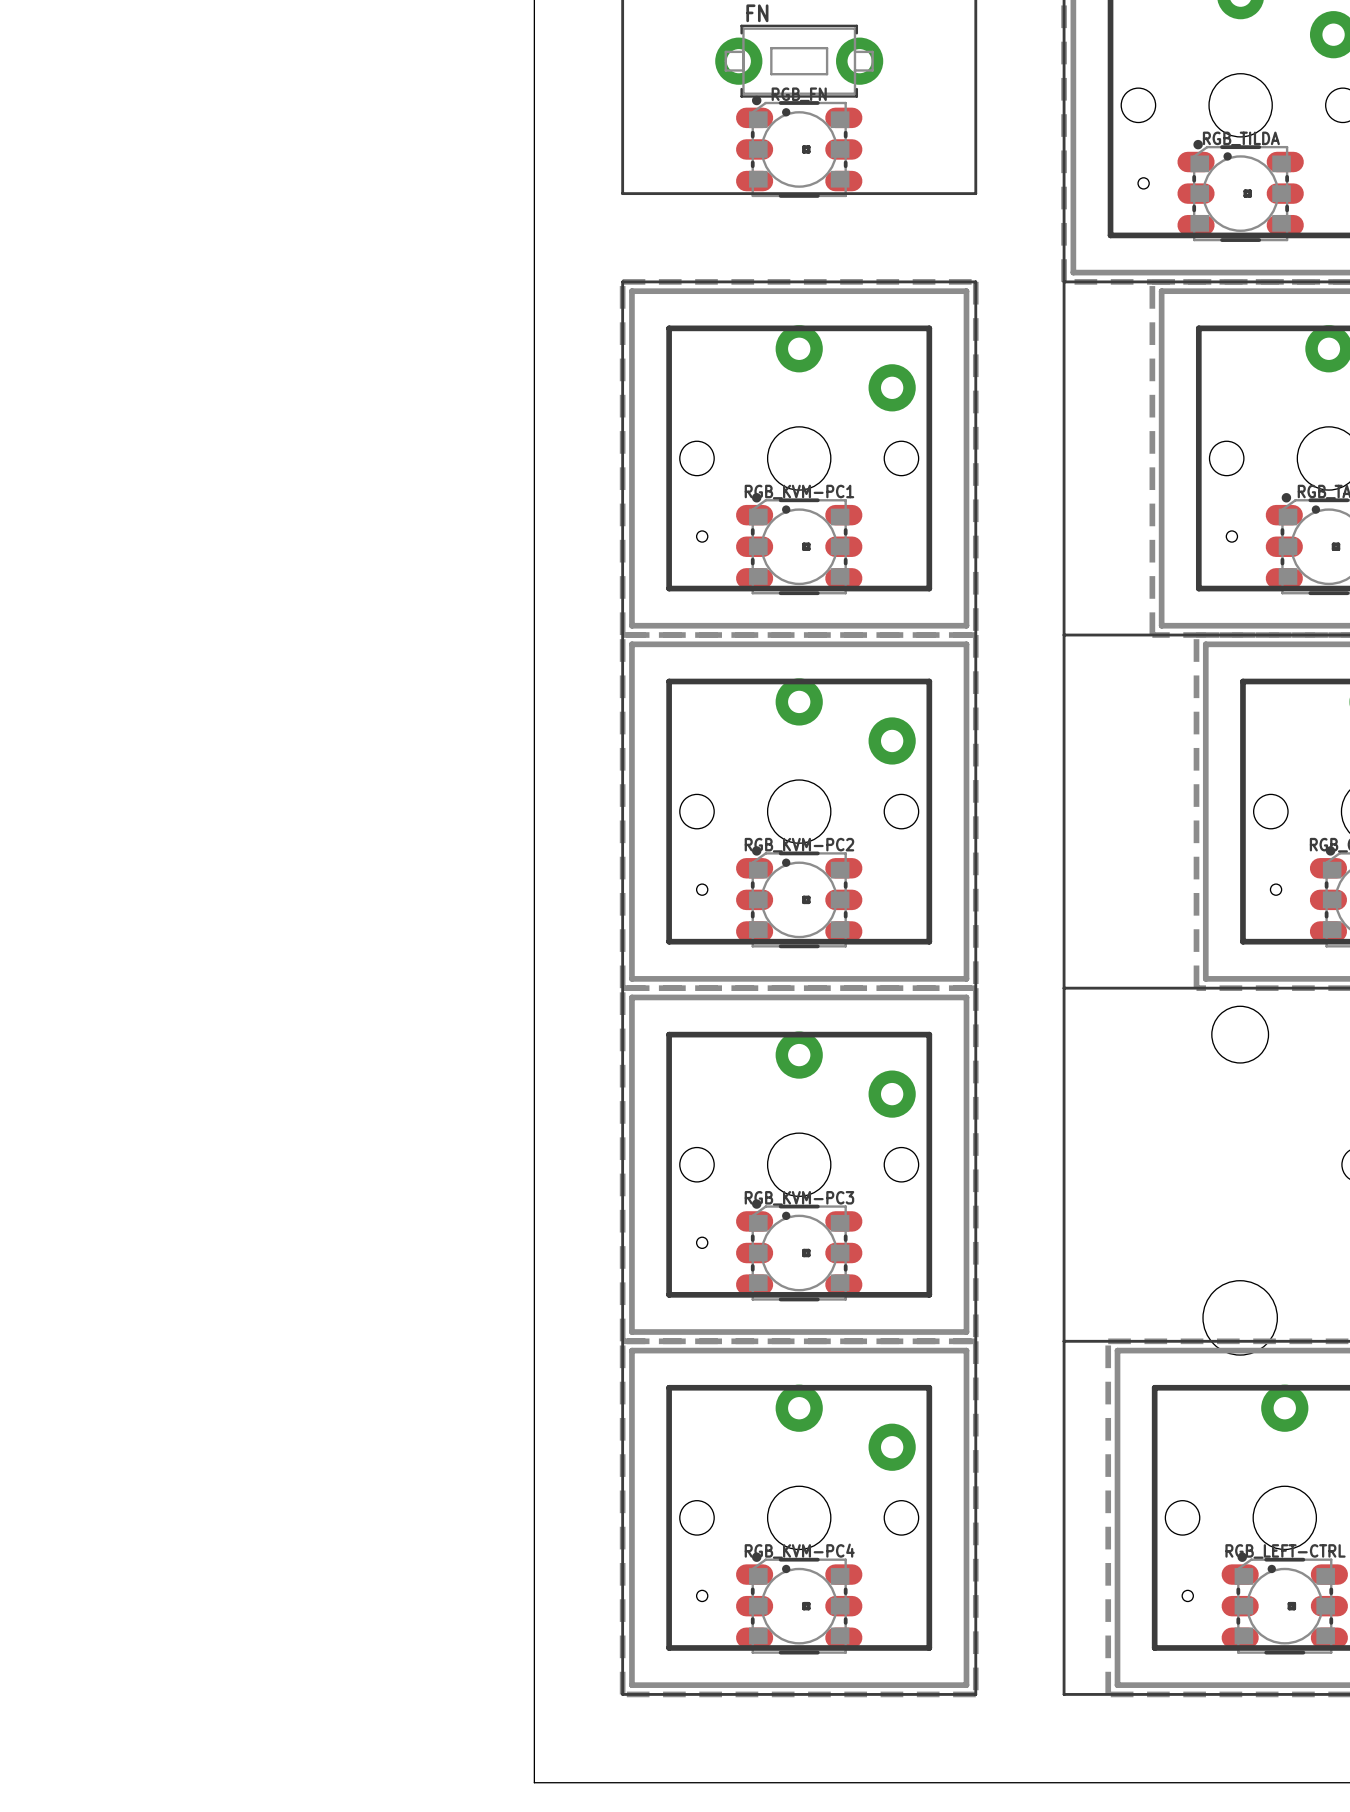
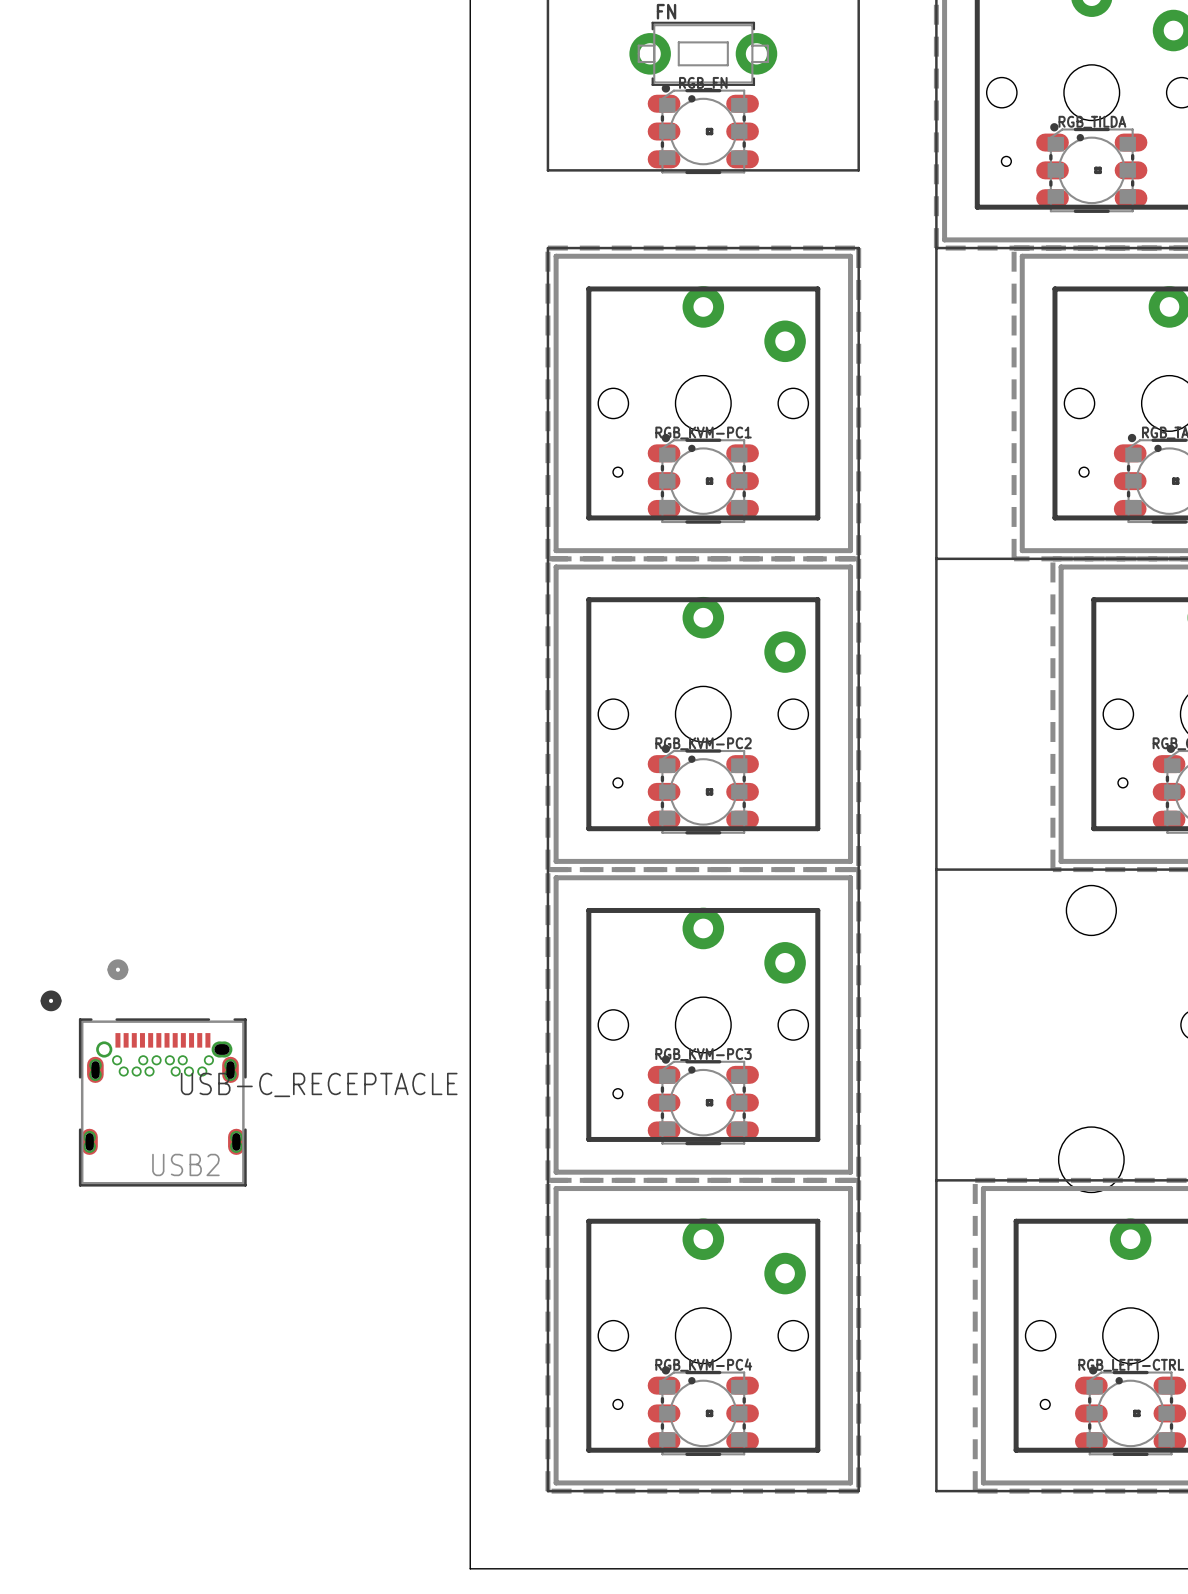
USB2: none -> USB-C_RECEPTACLE (143, 1072)

